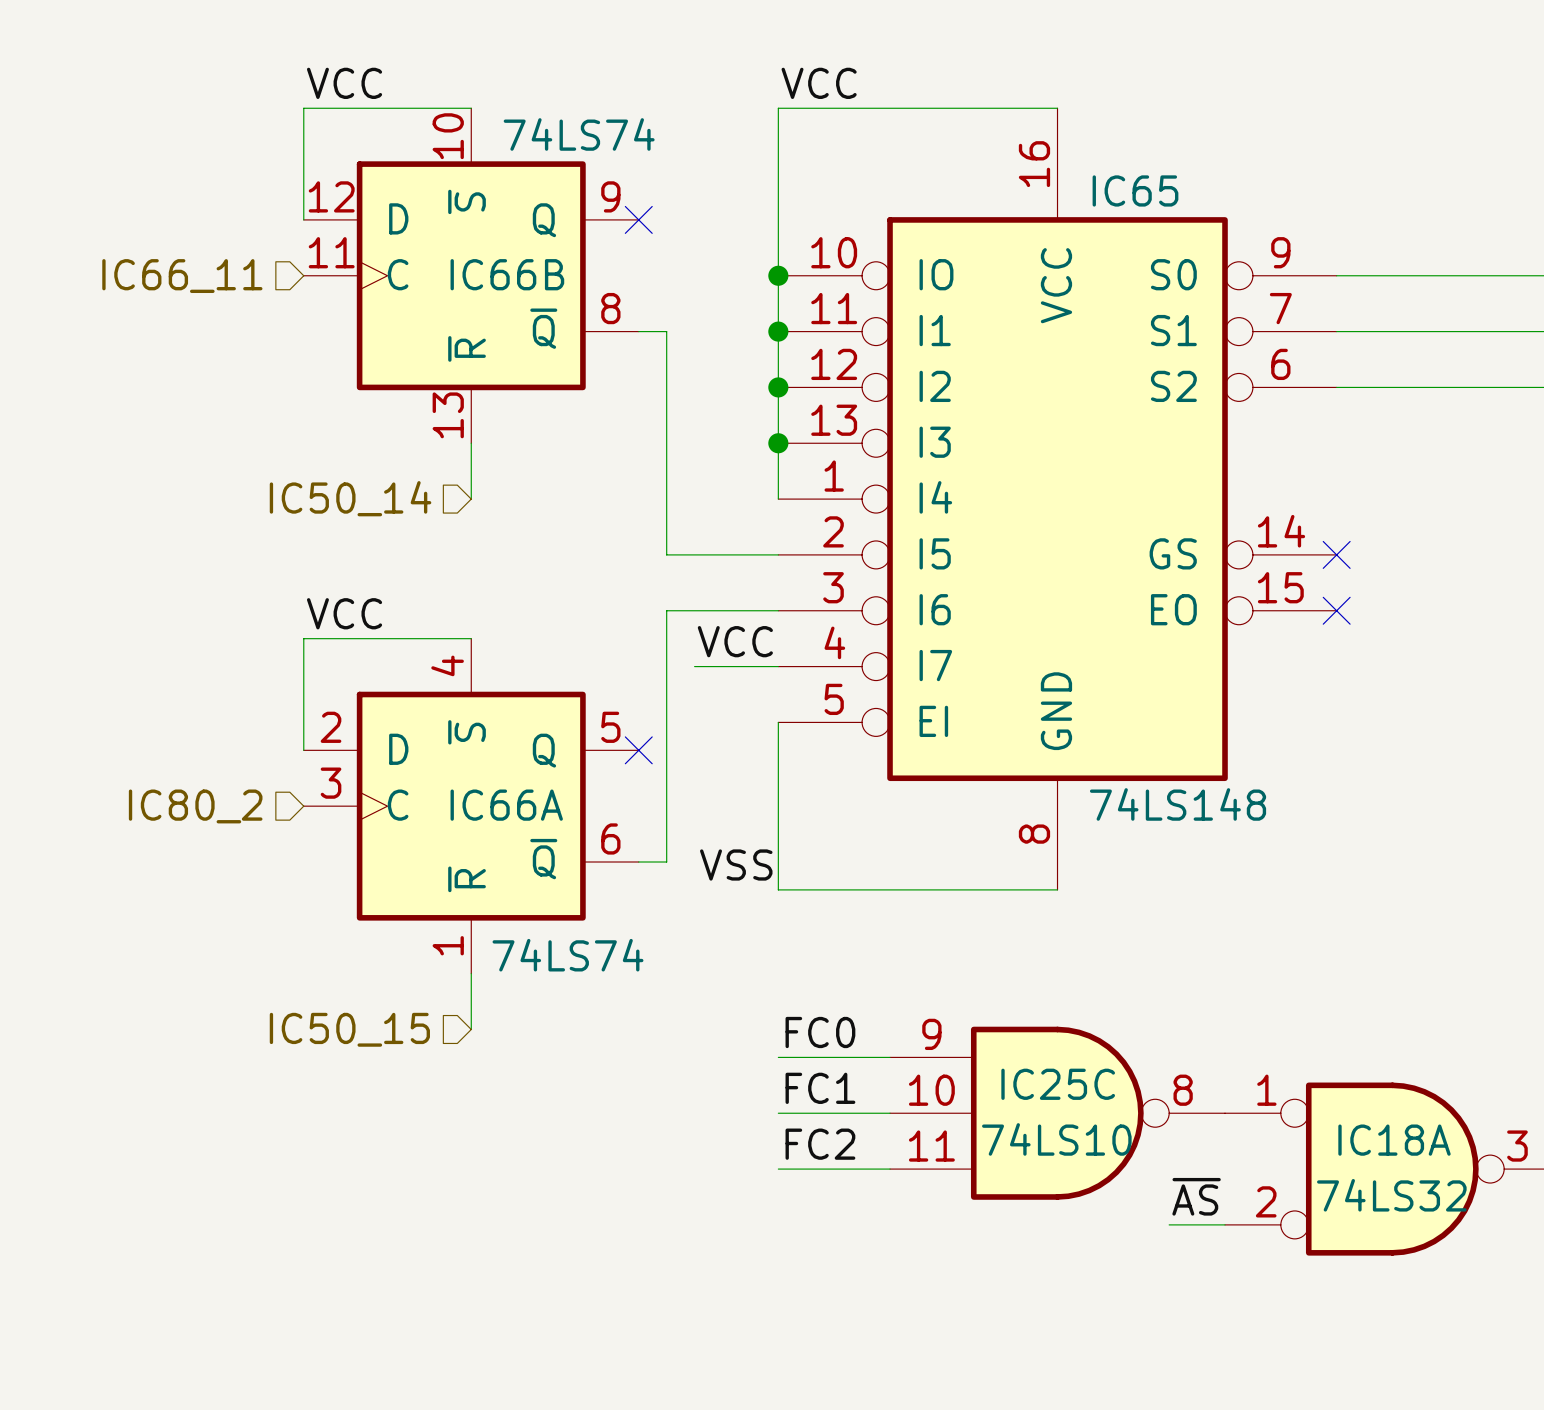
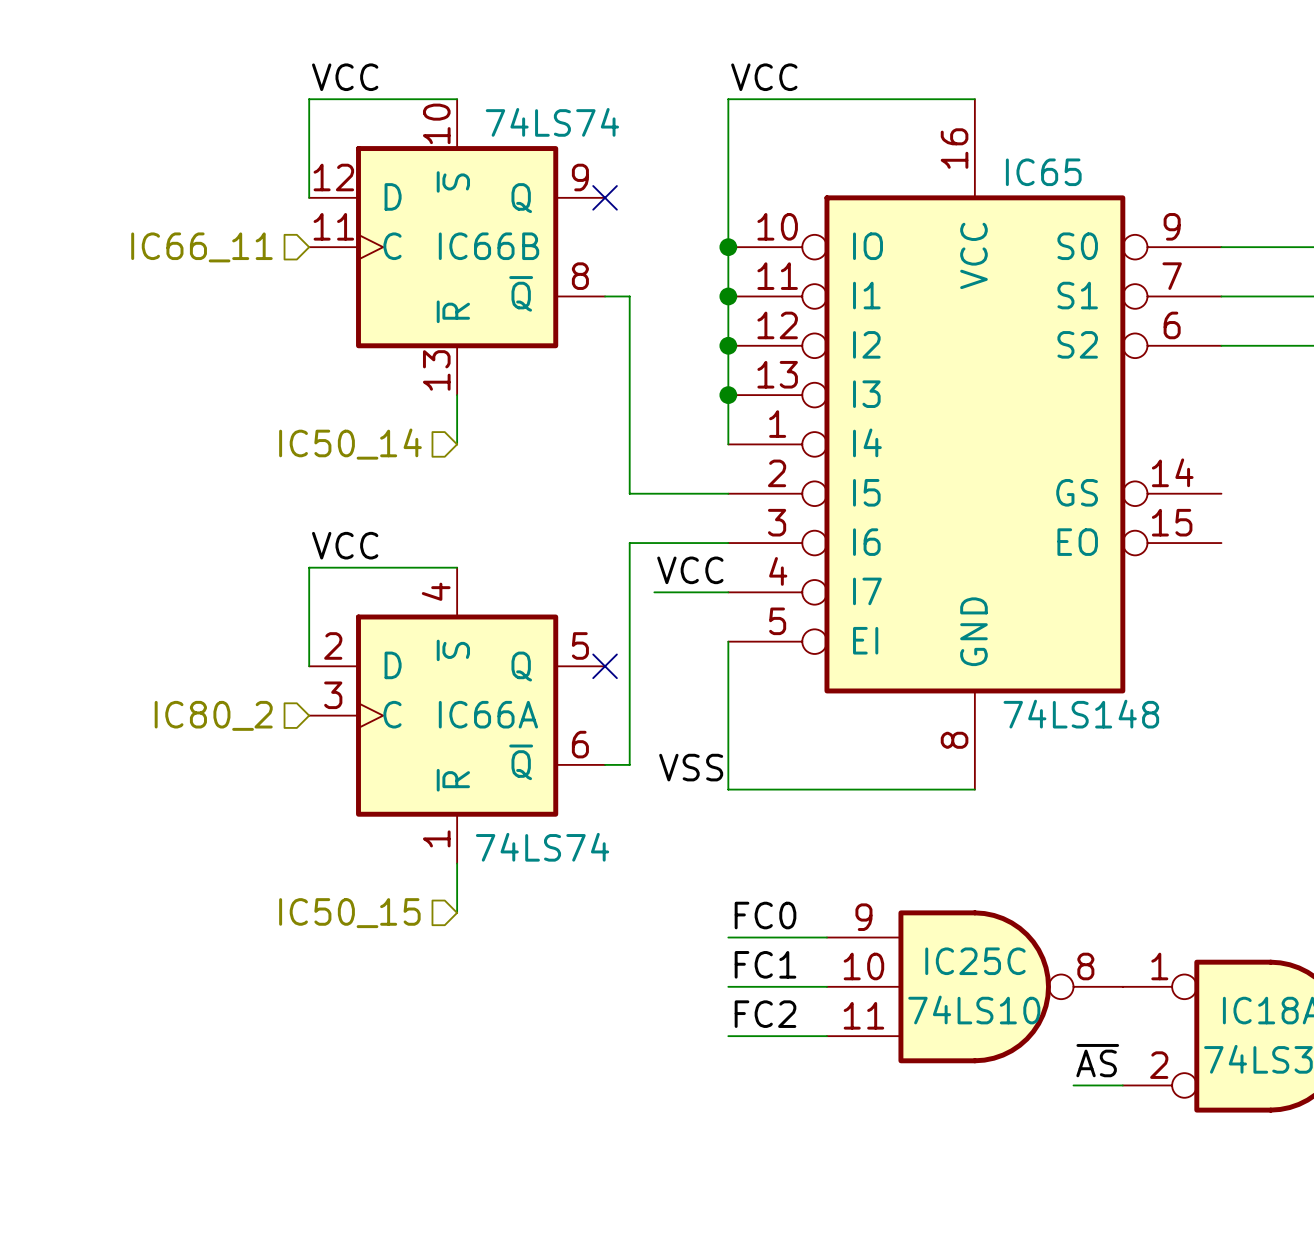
no-connect mark: (1336, 554) -> none
no-connect mark: (1336, 610) -> none

